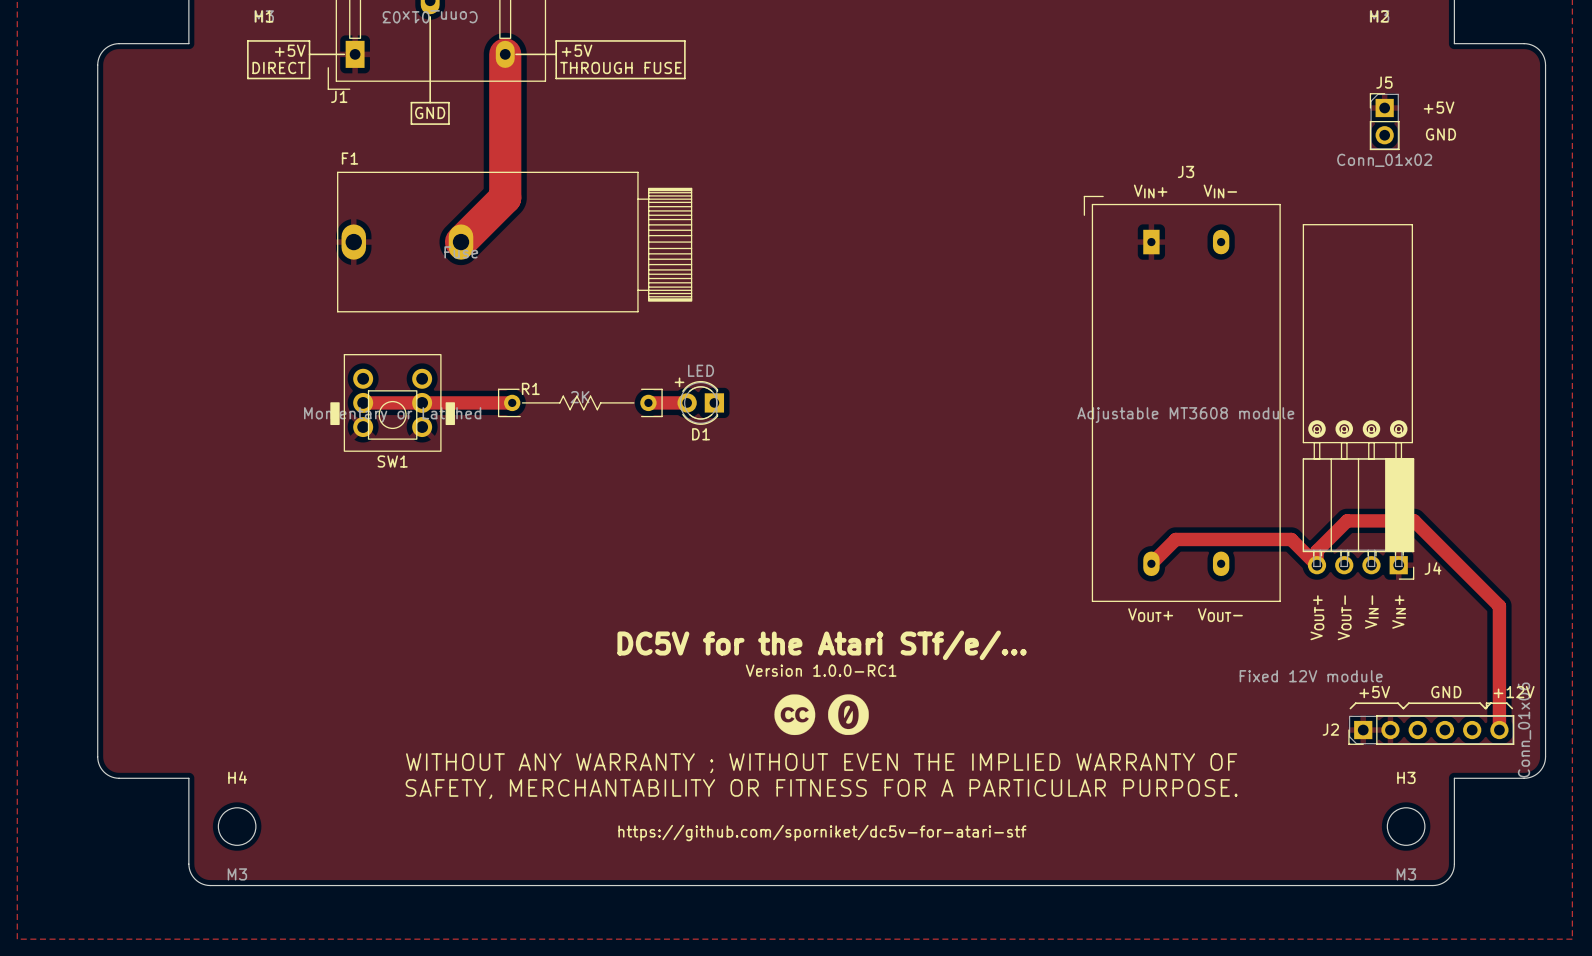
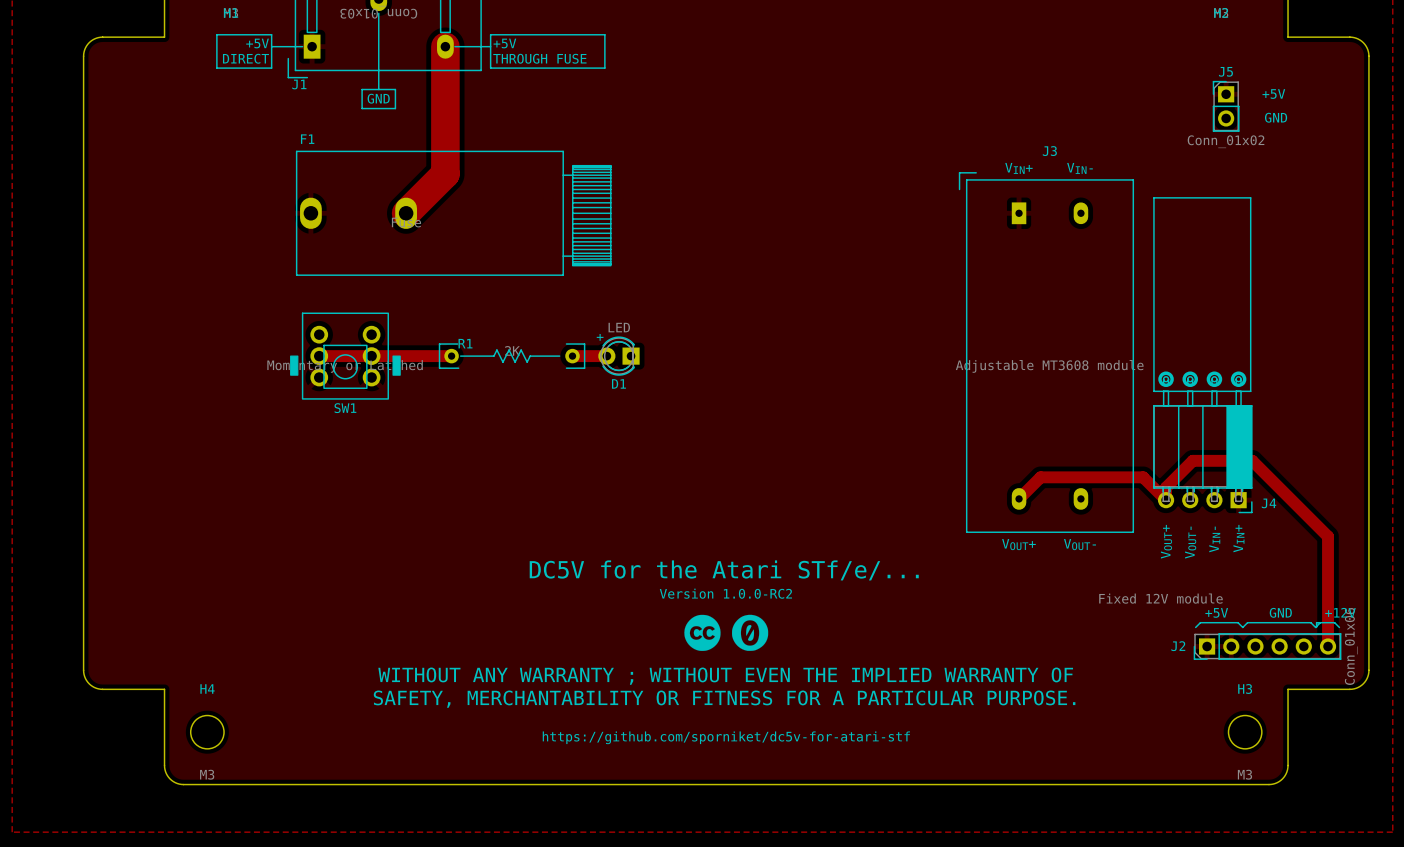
text: Version 1.0.0-RC1 (821, 670) -> Version 1.0.0-RC2 (725, 593)

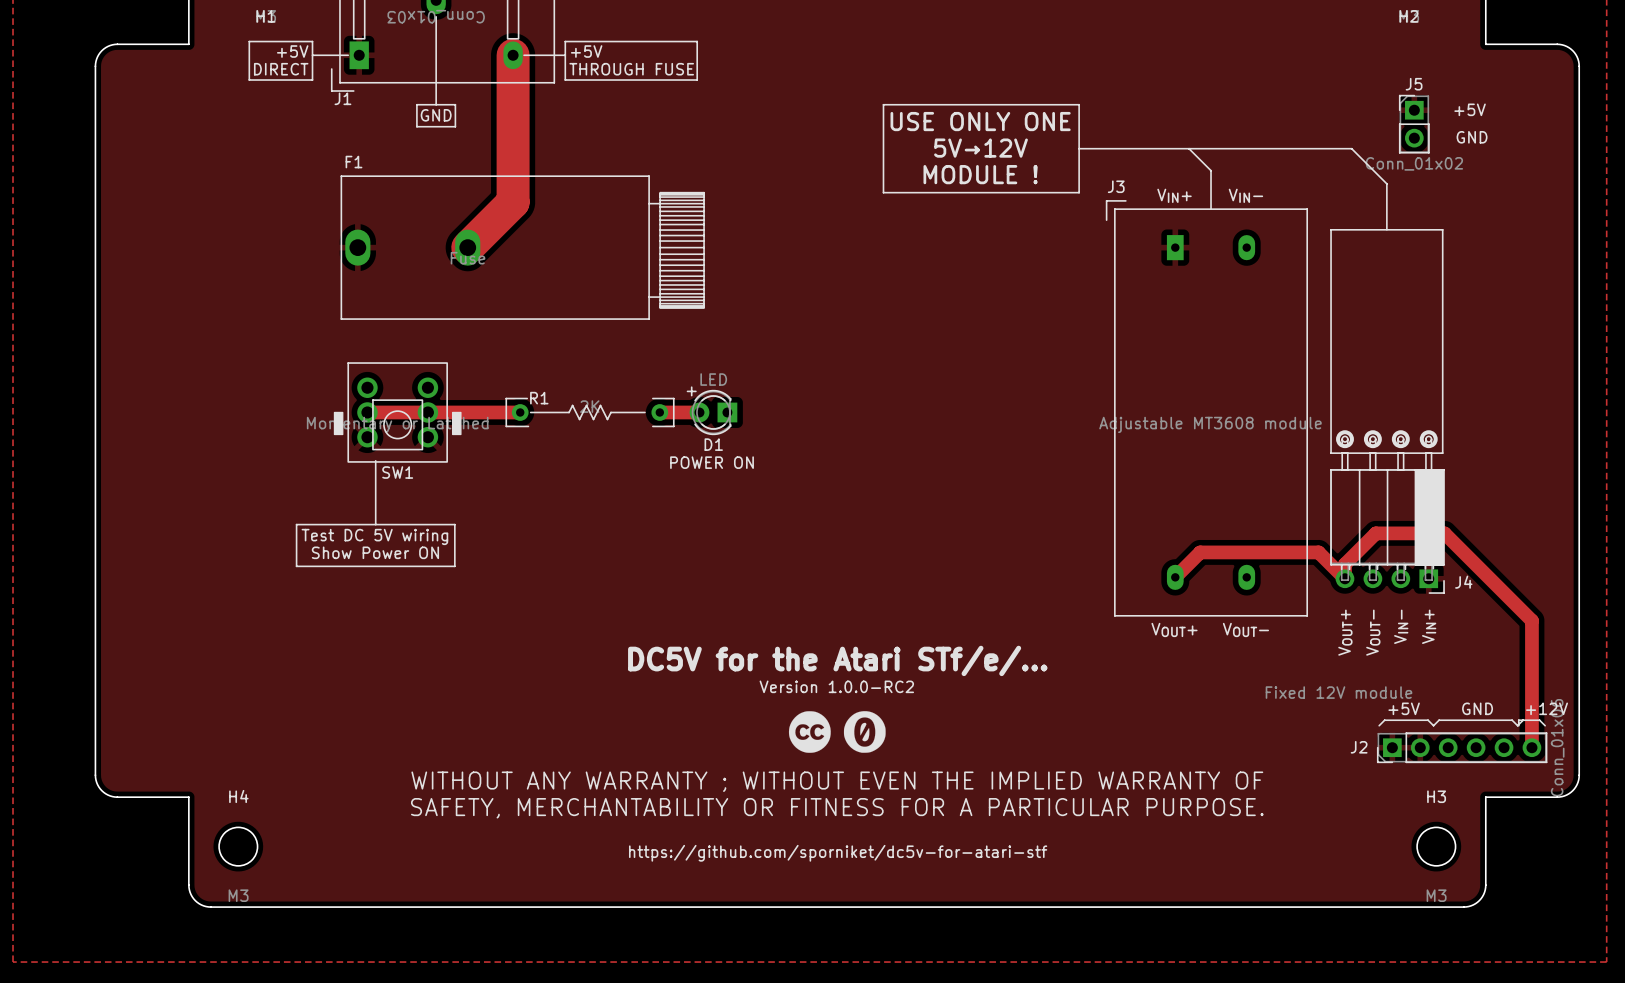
line: none -> (883, 104) (1079, 104) (1079, 192) (883, 192) (883, 104)
text: none -> USE ONLY ONE (980, 121)
text: none -> 5V→12V (980, 148)
line: none -> (1079, 148) (1351, 148) (1386, 183) (1386, 229)
line: none -> (1189, 148) (1211, 170) (1211, 209)
text: none -> MODULE ! (980, 174)
J3 name position: J3 (1049, 151) -> J3 (1116, 186)
line: none -> (375, 460) (375, 524)
text: none -> POWER ON (712, 462)
line: none -> (296, 524) (454, 524) (454, 566) (296, 566) (296, 524)
text: none -> Test DC 5V wiring (374, 536)
text: none -> Show Power ON (375, 552)

